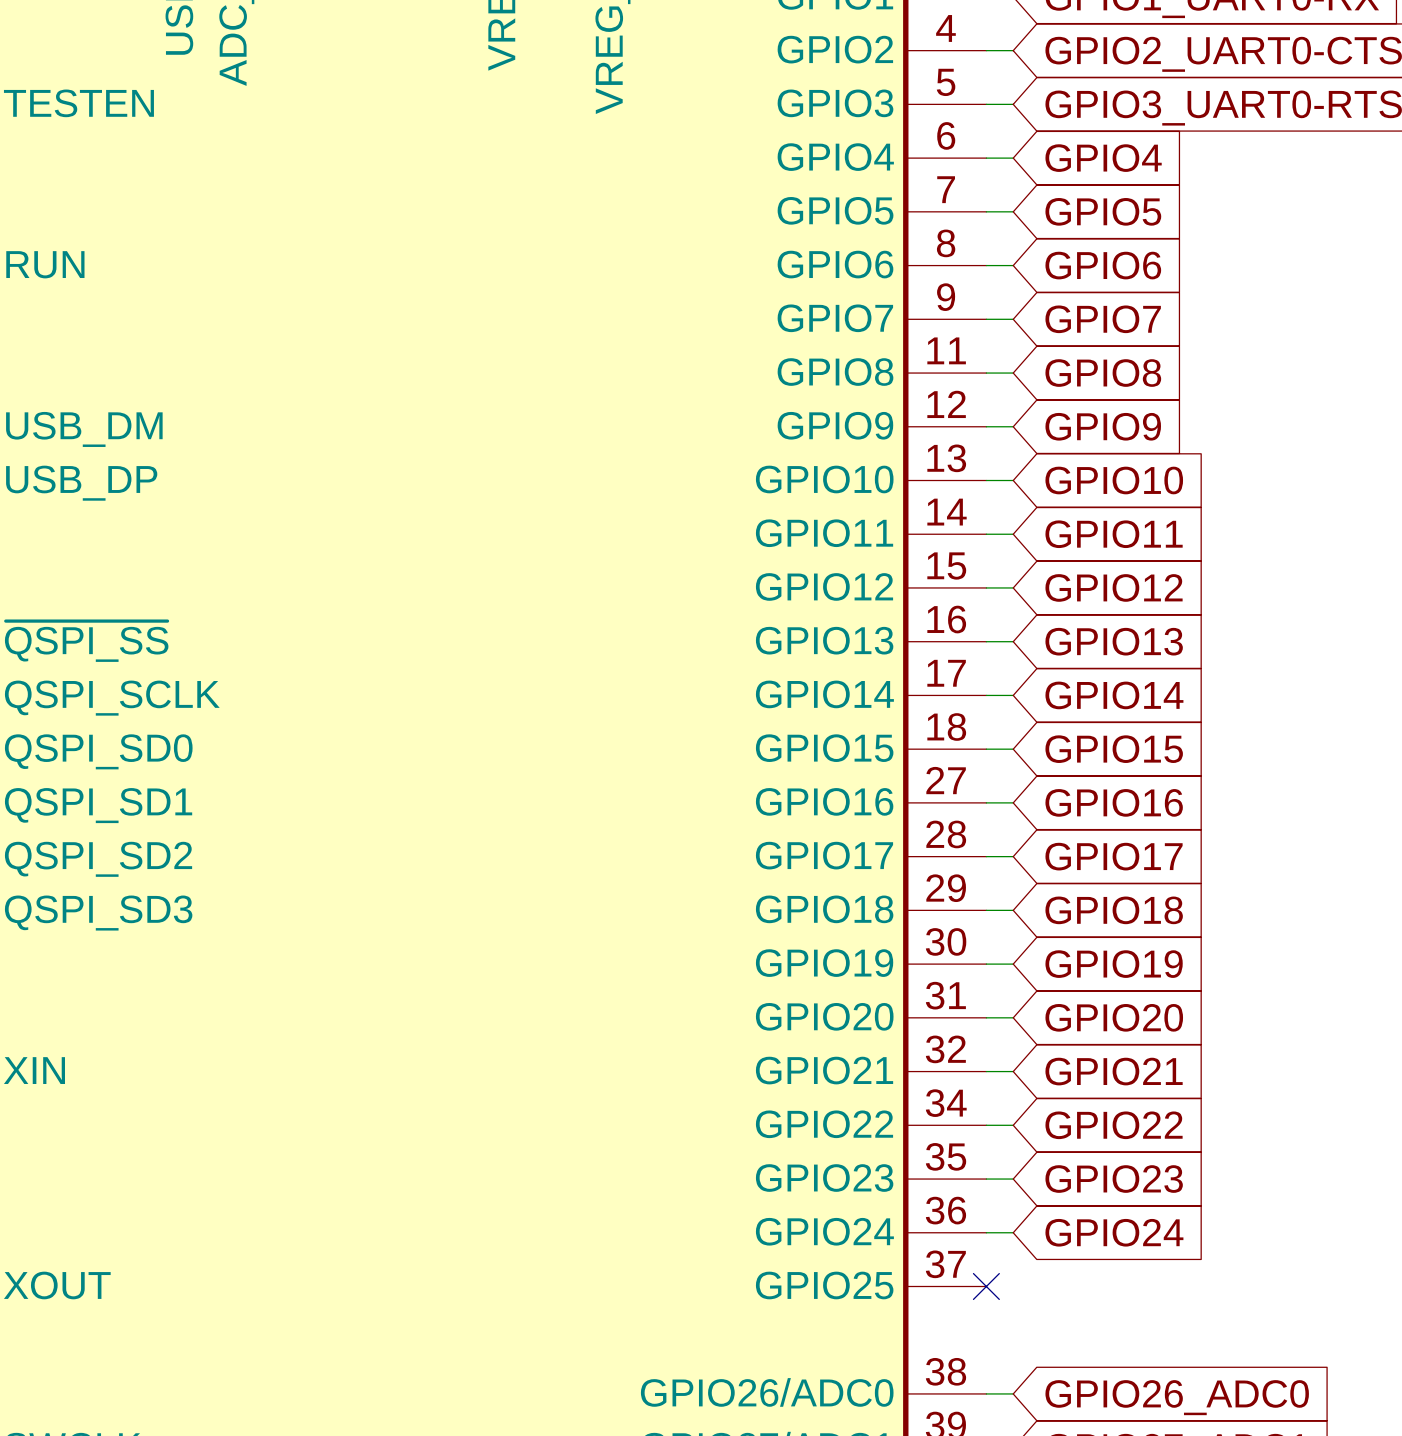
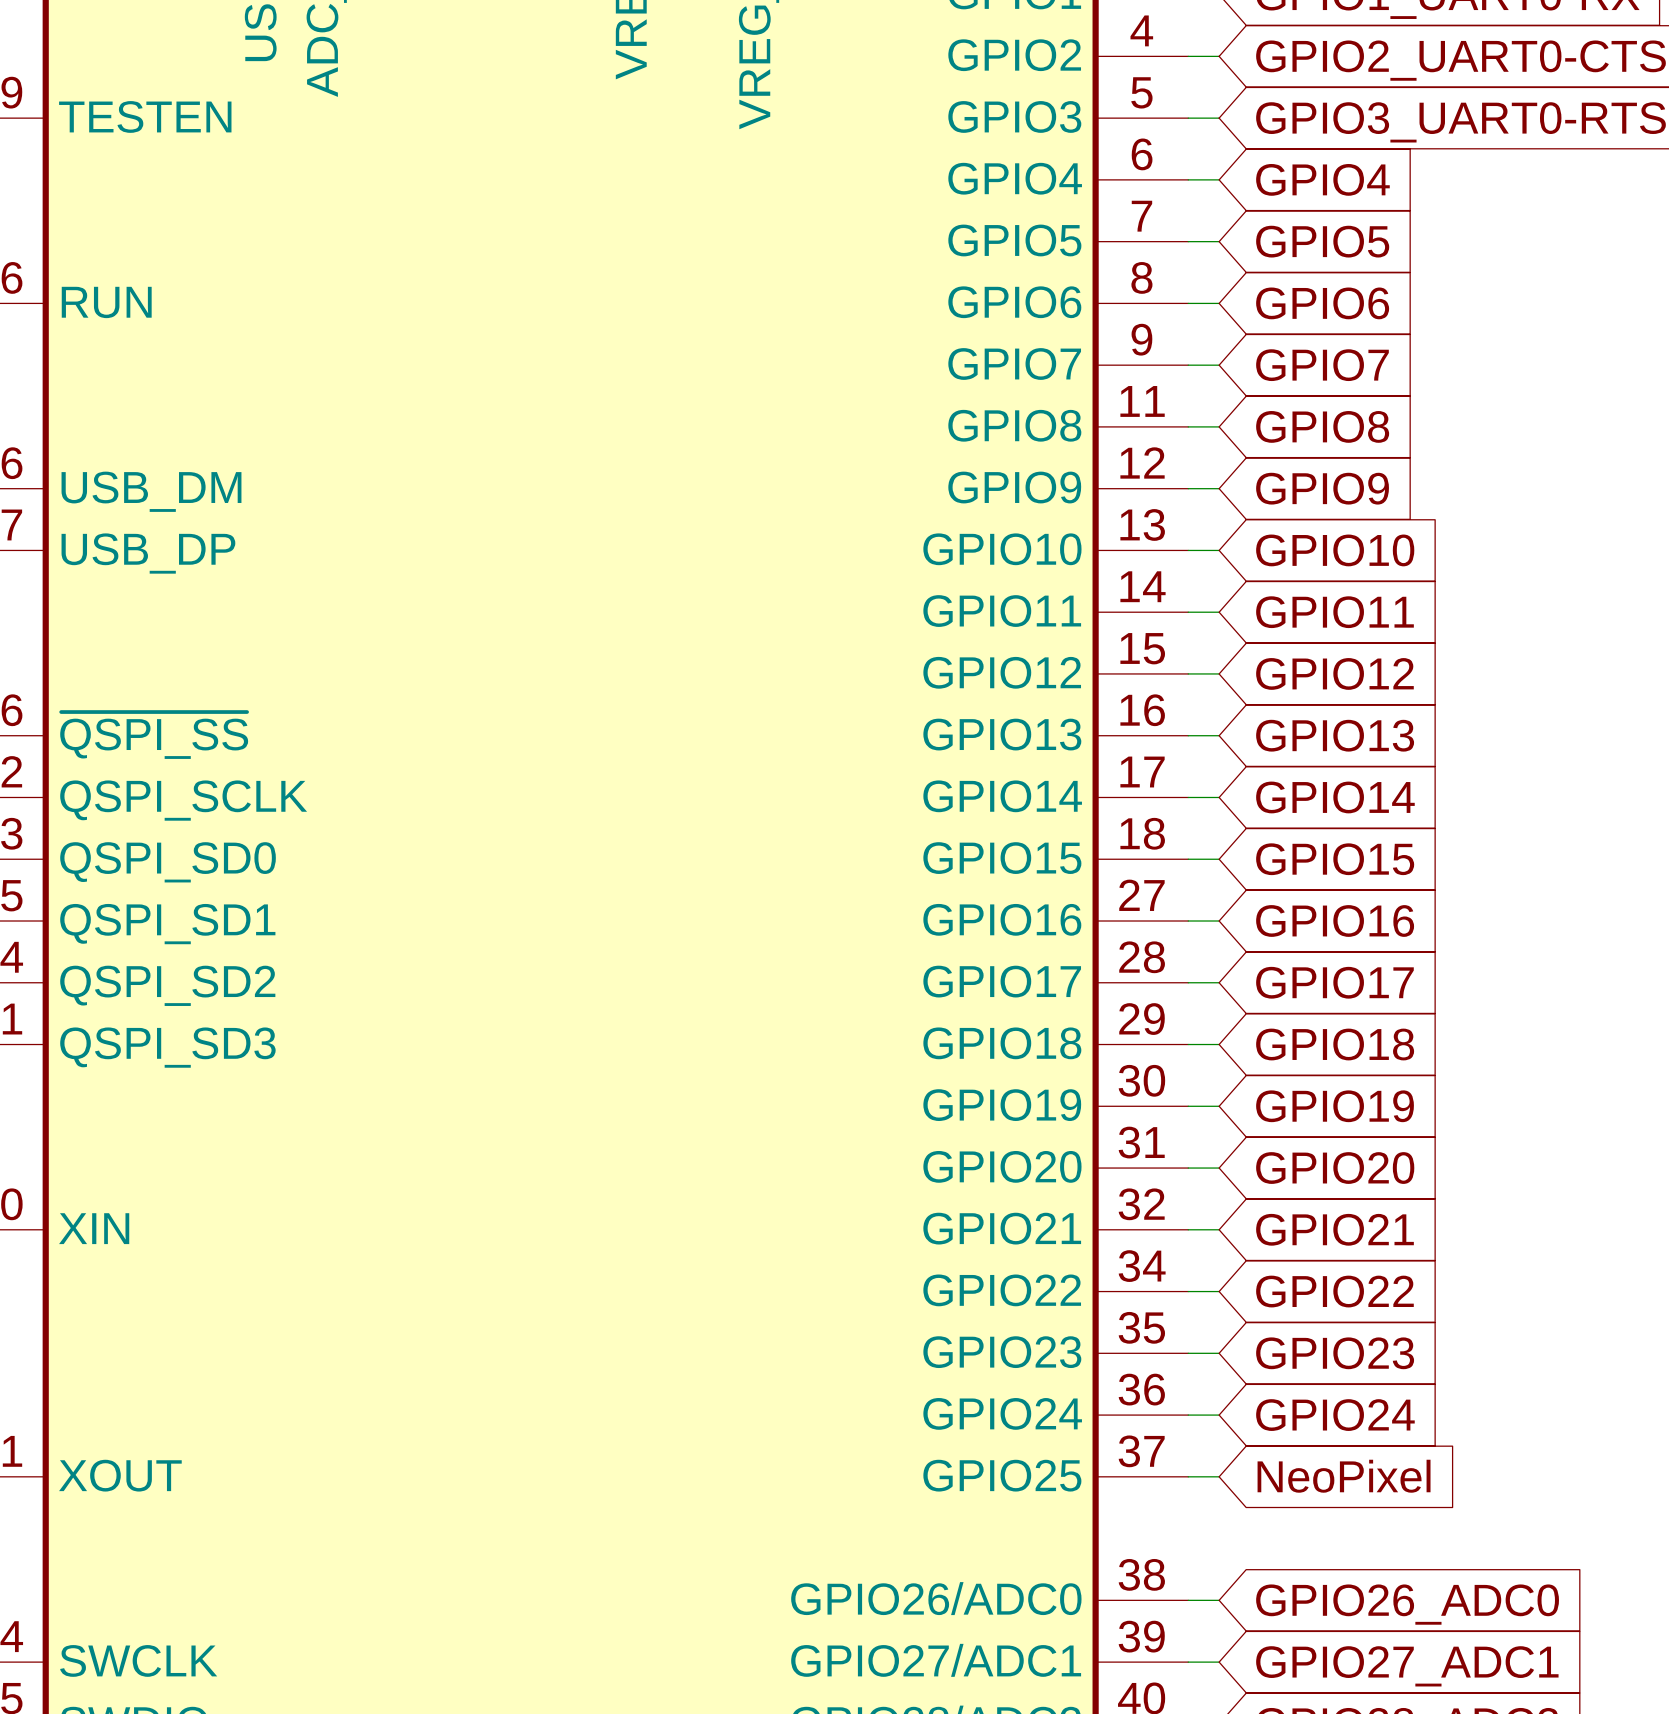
global label: none -> NeoPixel (1344, 1476)
wire: none -> (1188, 1476) (1219, 1476)
no-connect mark: (986, 1286) -> none

